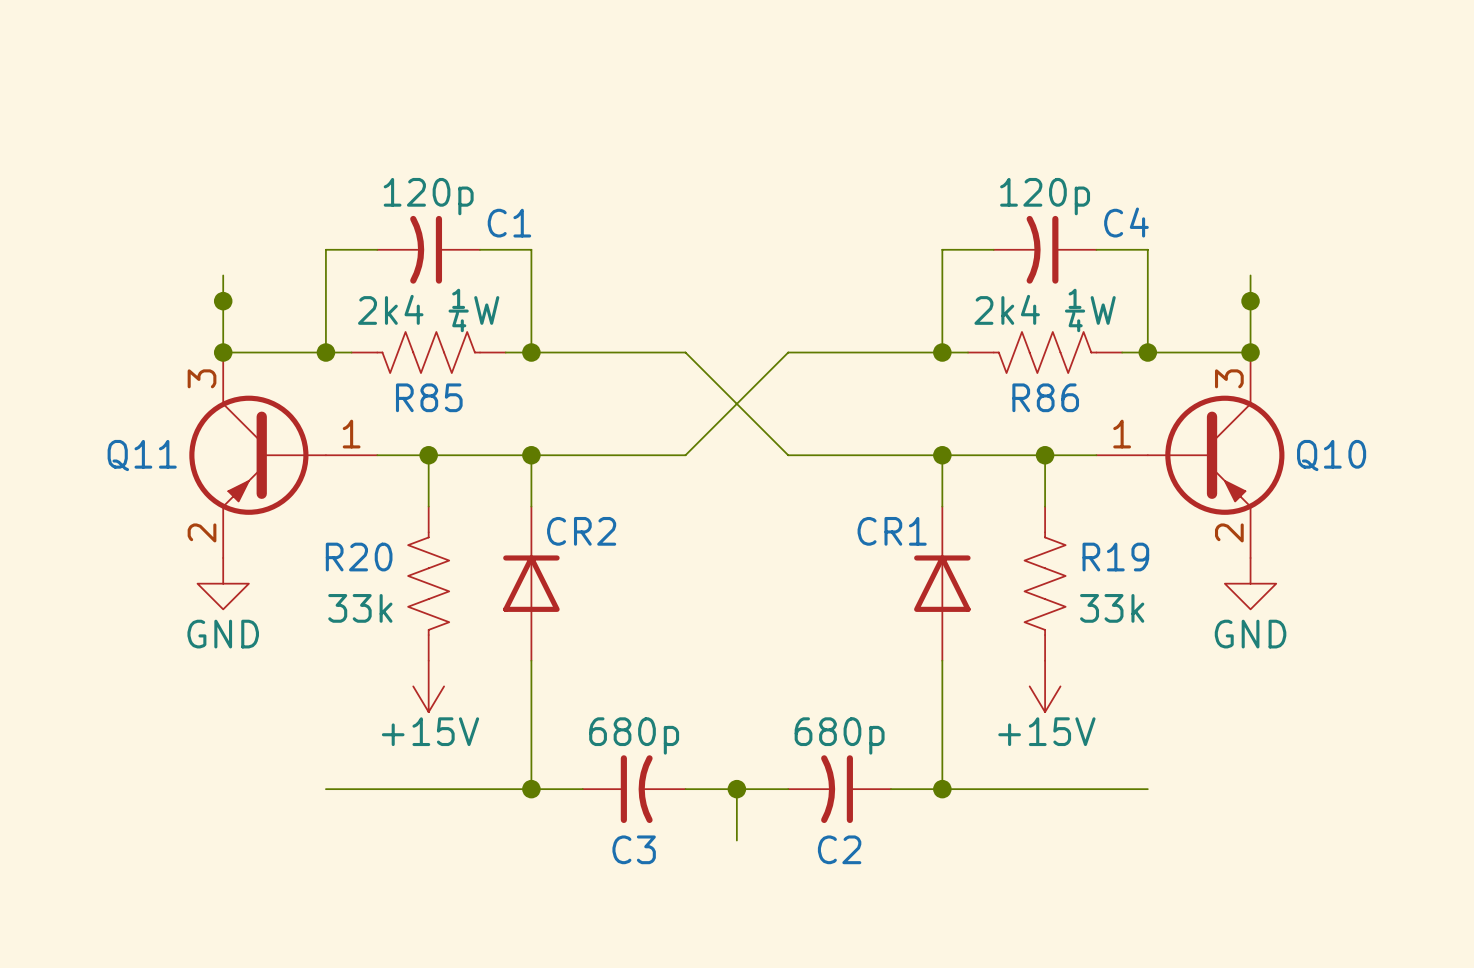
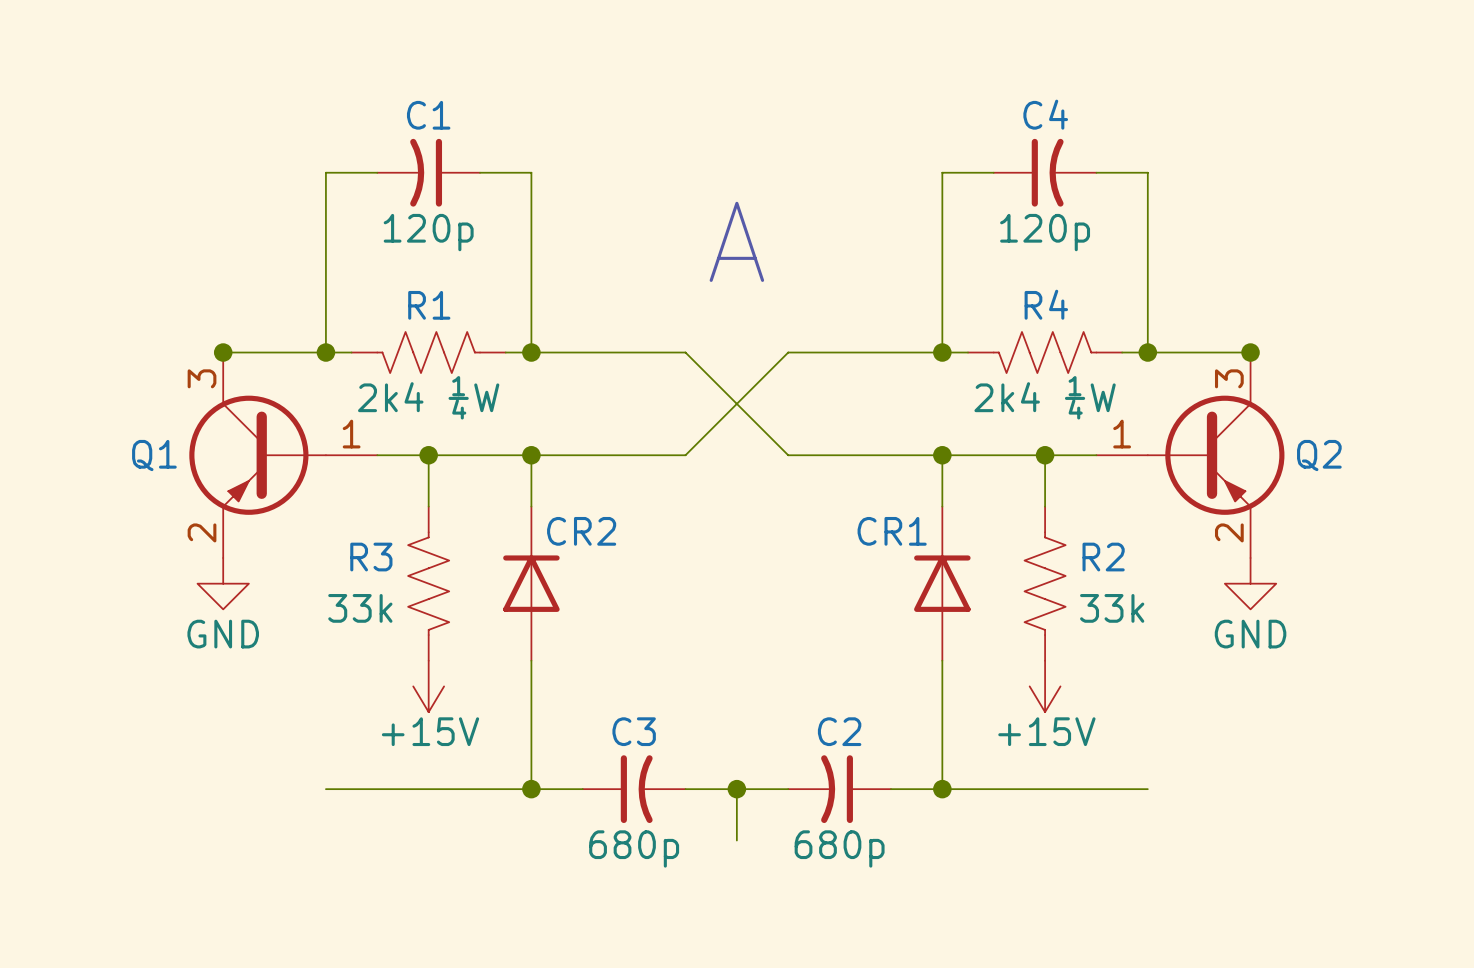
C1 value position: 120p (428, 196) -> 120p (428, 232)
C4 name position: C4 (1126, 222) -> C4 (1045, 114)
C1 name position: C1 (509, 223) -> C1 (428, 115)
text: none -> A (736, 241)
wire: (325, 249) (377, 249) -> (325, 249) (325, 172) (377, 172)
C1 position: (428, 249) -> (428, 172)
wire: (480, 249) (531, 249) -> (480, 172) (531, 172) (531, 249)
wire: (942, 249) (993, 249) -> (942, 249) (942, 172) (993, 172)
C4 rotation: 0° (1042, 249) -> 180° (1047, 172)
C4 position: (1045, 249) -> (1045, 172)
wire: (1096, 249) (1147, 249) -> (1096, 172) (1147, 172) (1147, 249)
wire: (223, 275) (223, 352) -> none
wire: (1250, 275) (1250, 352) -> none
junction: (223, 301) -> none
junction: (1250, 301) -> none
R85 value position: 2k4 ¼W (428, 310) -> 2k4 ¼W (428, 397)
R86 value position: 2k4 ¼W (1045, 310) -> 2k4 ¼W (1045, 397)
R85 name: R85 (429, 397) -> R1 (429, 305)
R86 name: R86 (1045, 397) -> R4 (1046, 304)
Q11 name: Q11 (142, 455) -> Q1 (154, 455)
Q10 name: Q10 (1331, 455) -> Q2 (1319, 455)
R20 name: R20 (359, 557) -> R3 (371, 557)
R19 name: R19 (1115, 557) -> R2 (1103, 557)
C3 value position: 680p (634, 735) -> 680p (634, 848)
C2 value position: 680p (839, 735) -> 680p (839, 848)
C3 name position: C3 (634, 849) -> C3 (634, 731)
C2 name position: C2 (839, 849) -> C2 (839, 731)

